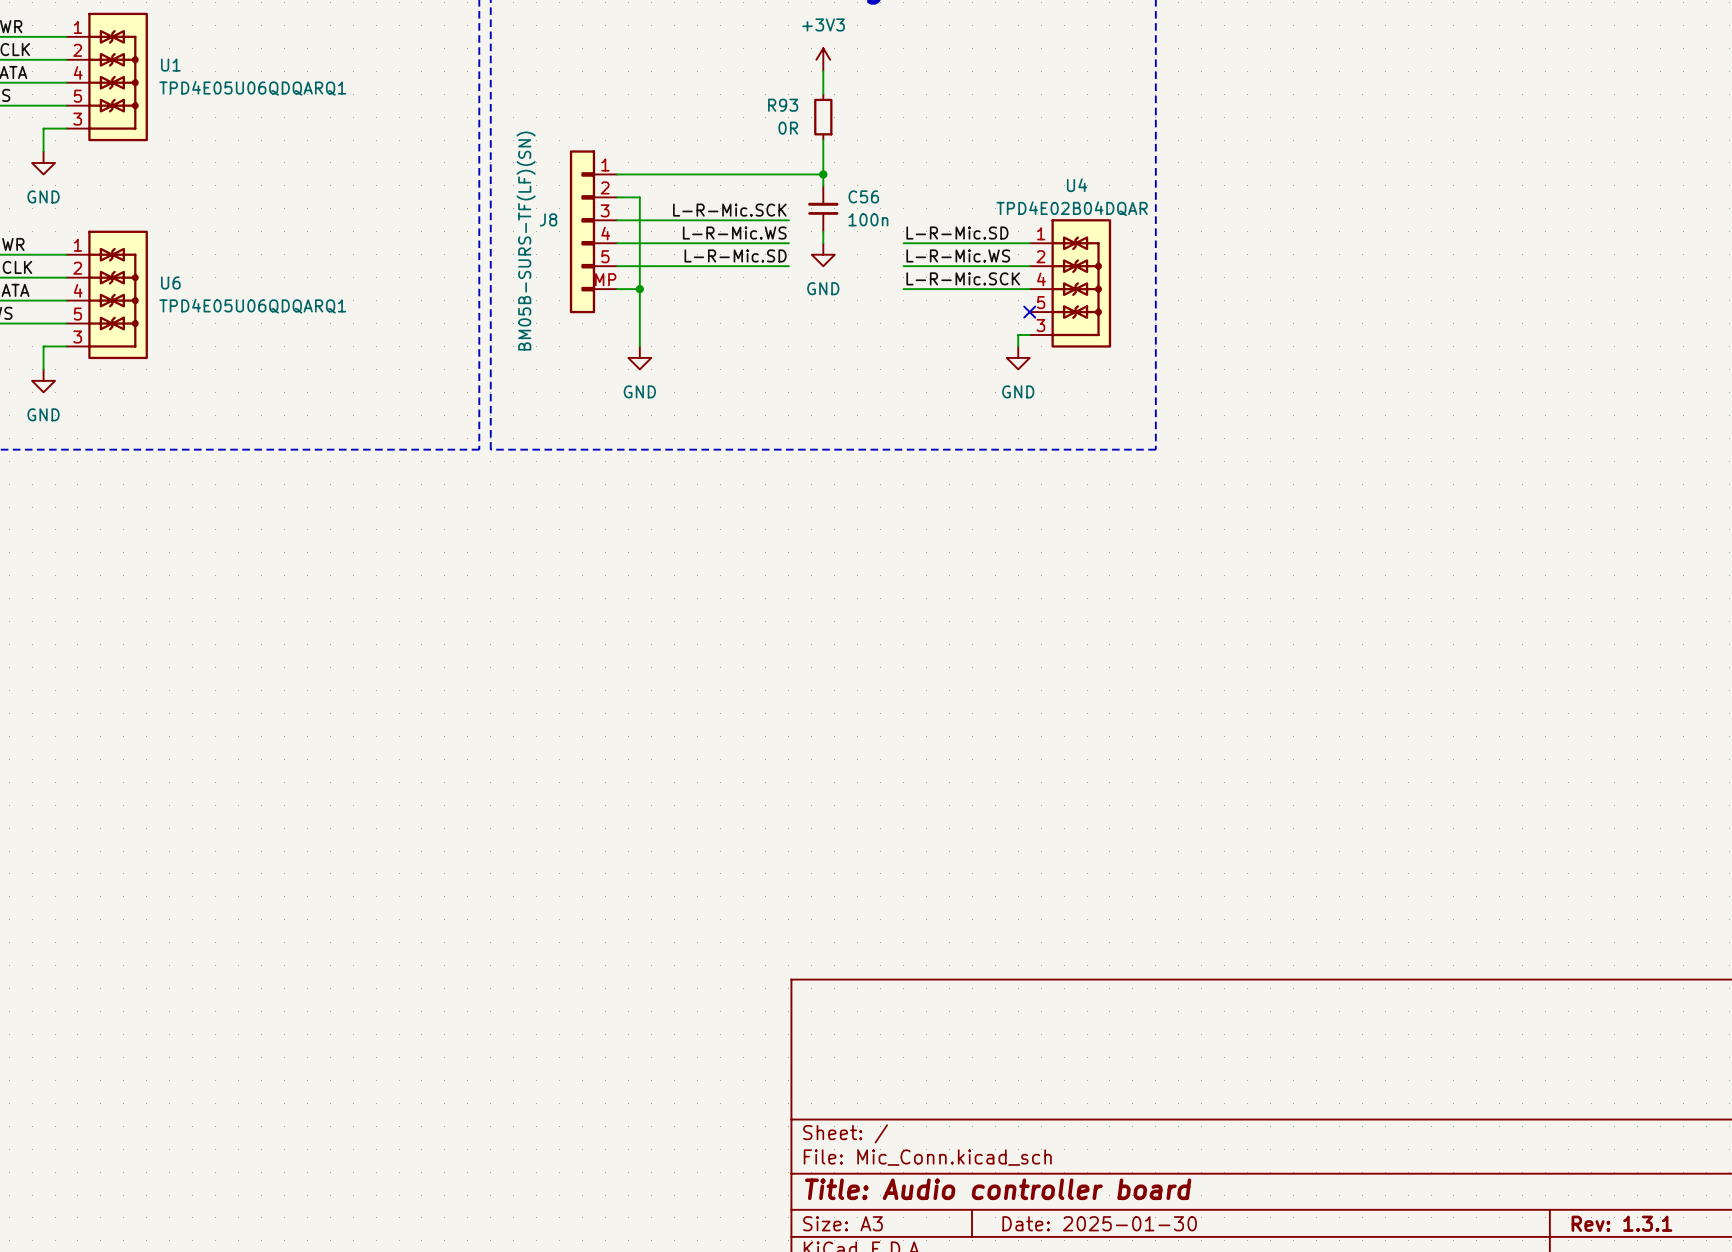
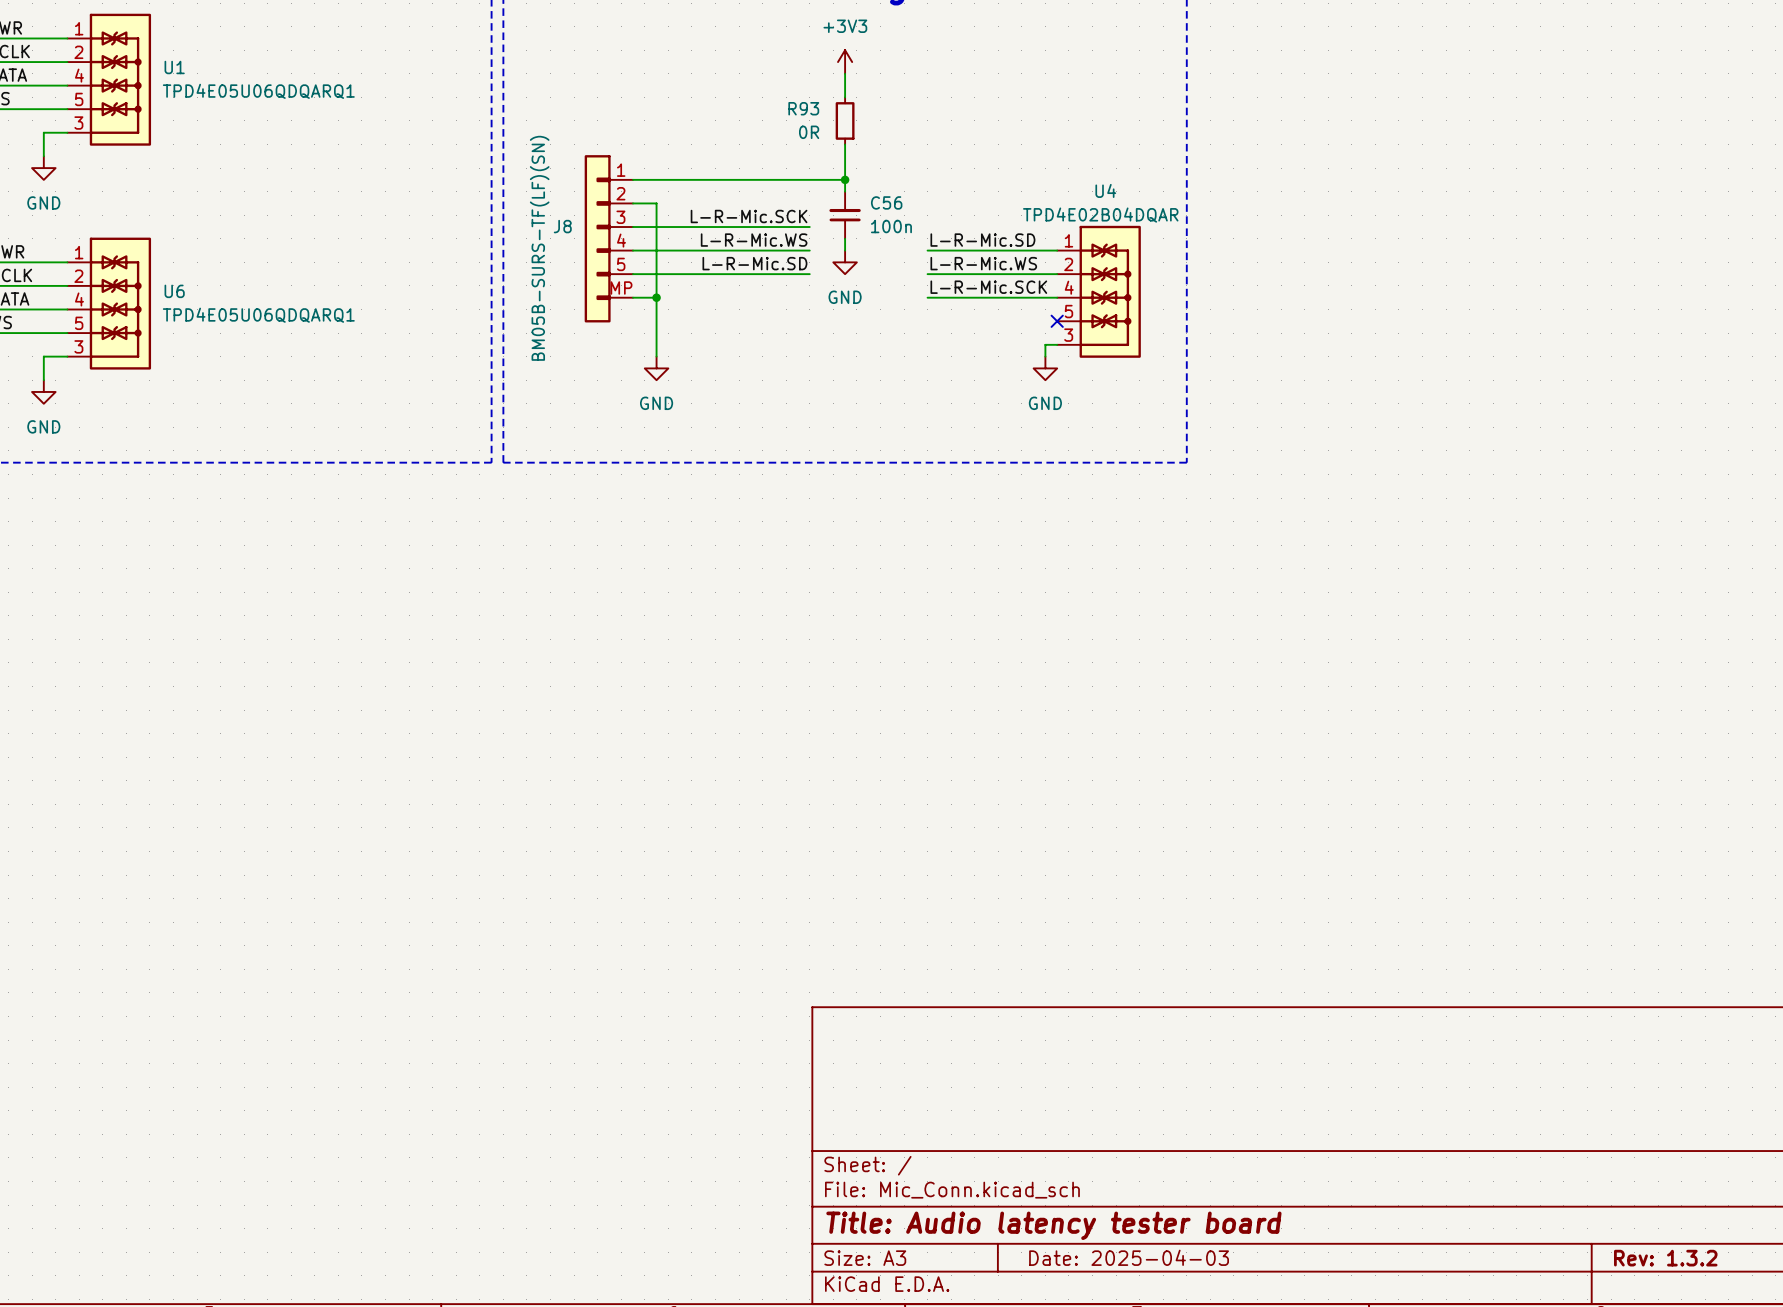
title block: Title: Audio controller board (998, 1189) -> Title: Audio latency tester board (1053, 1225)
title block: Date: 2025-01-30 (1099, 1223) -> Date: 2025-04-03 (1129, 1257)
title block: Rev: 1.3.1 (1621, 1223) -> Rev: 1.3.2 (1665, 1258)

